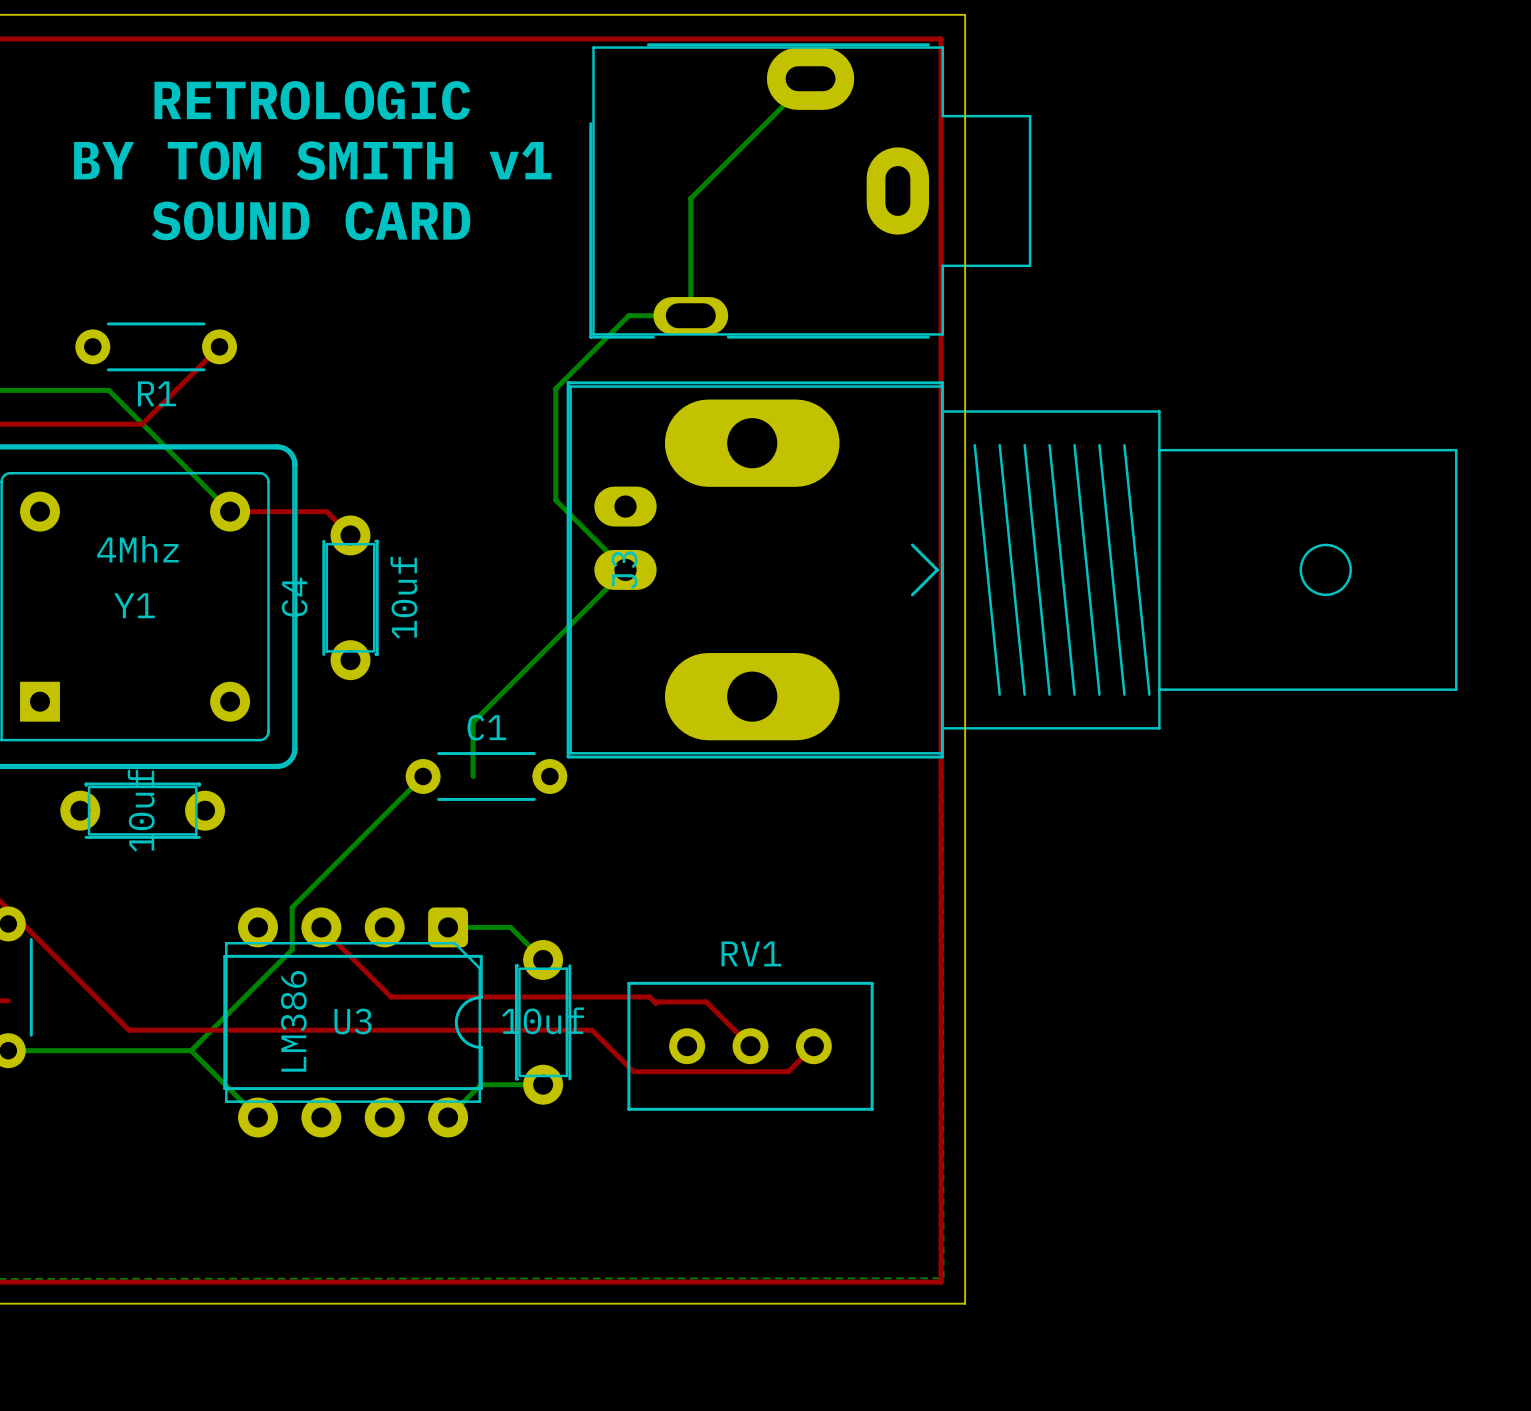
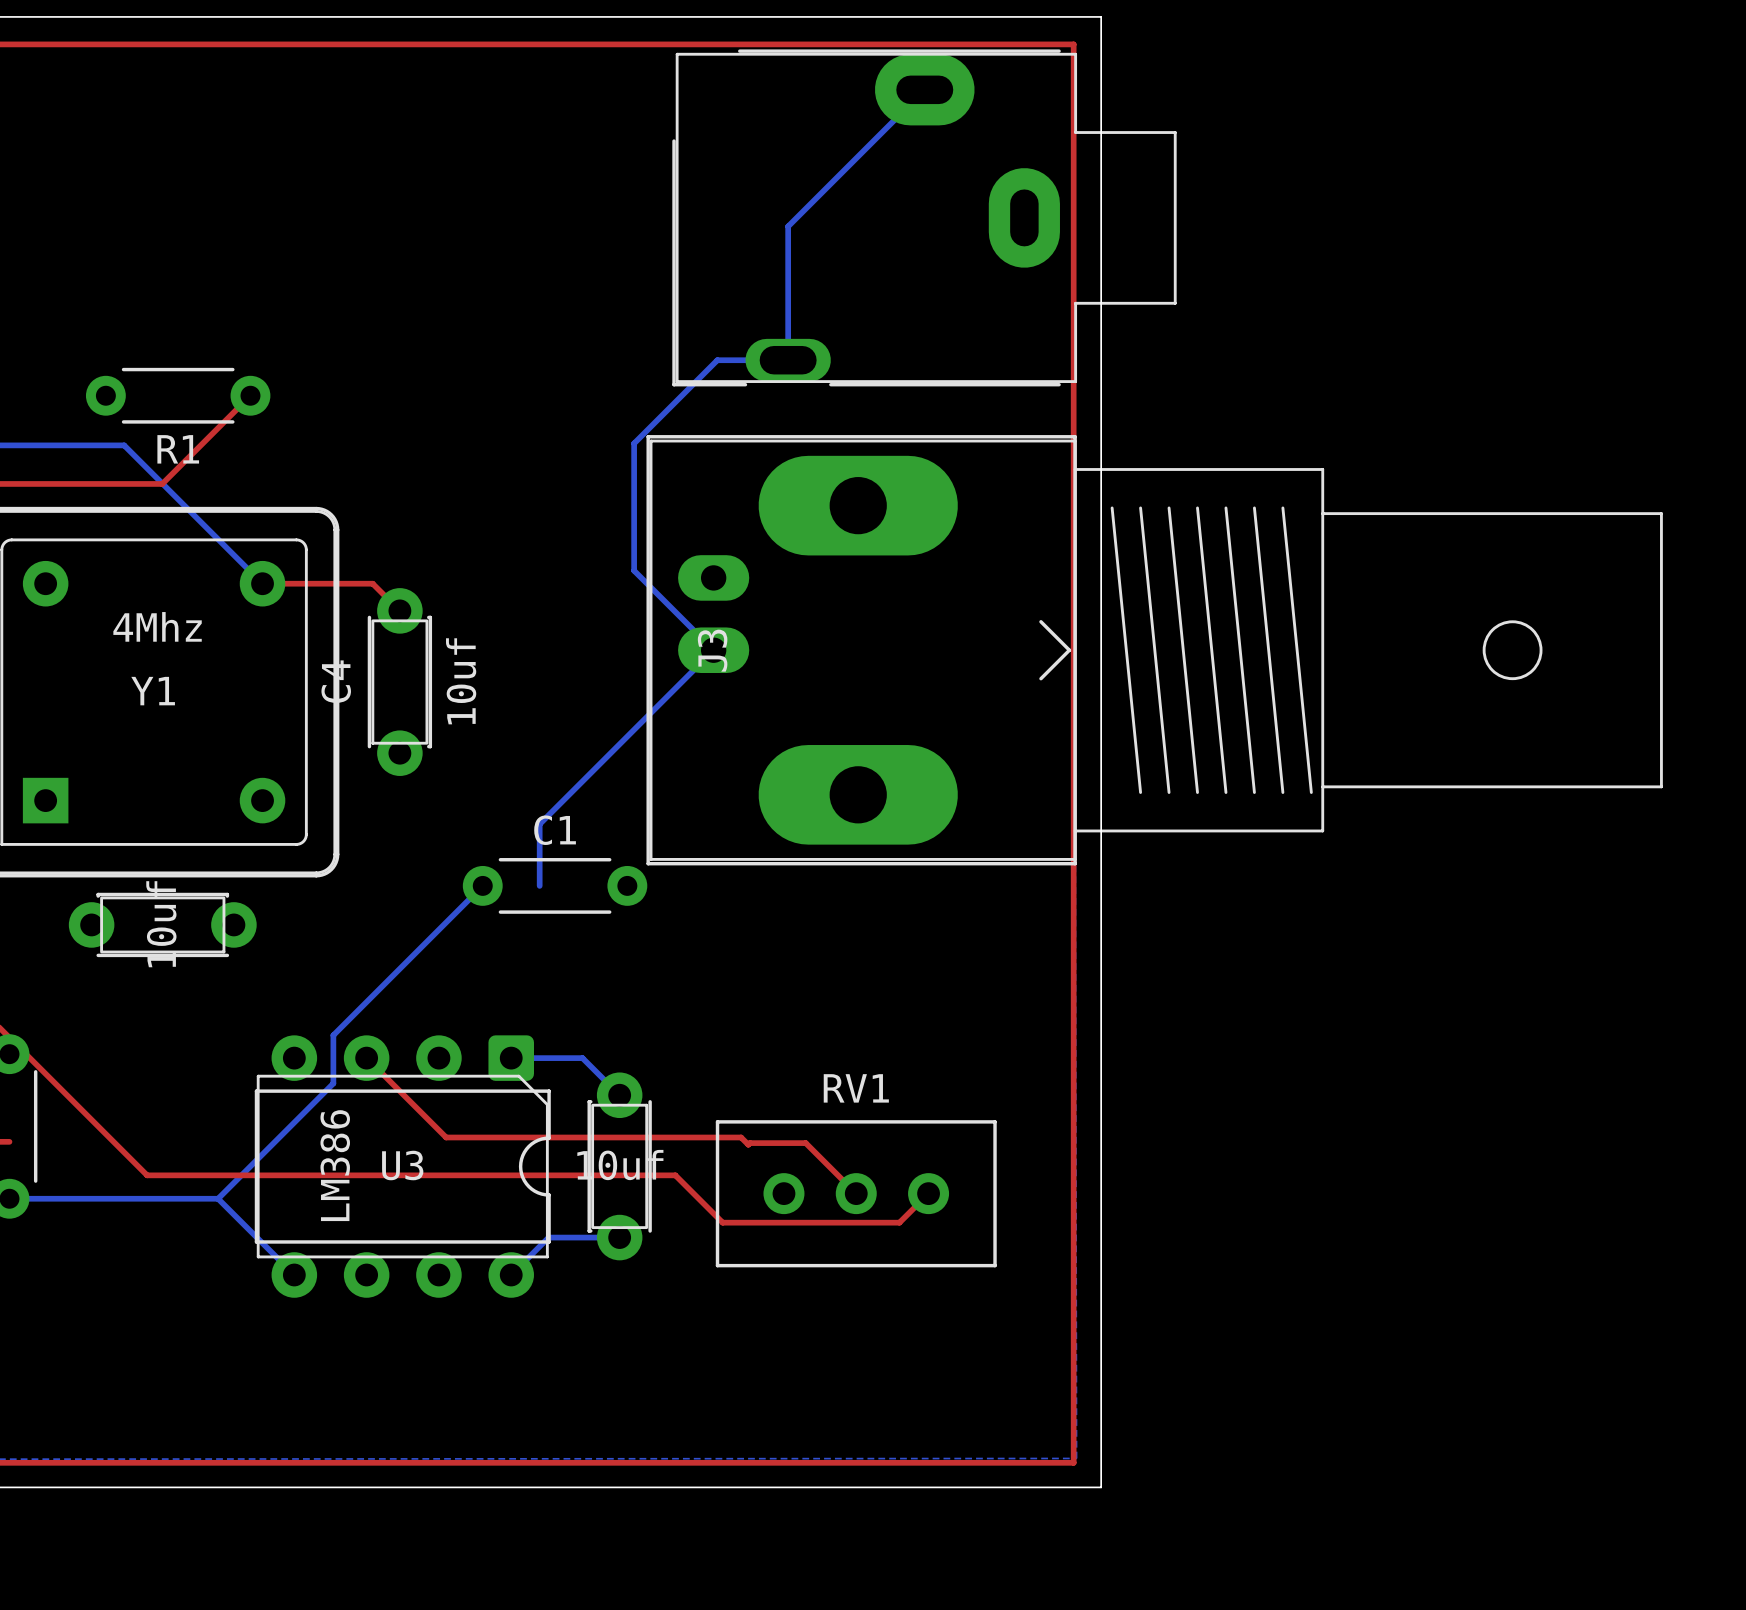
text: RETROLOGIC (312, 100) -> none
text: BY TOM SMITH v1 (312, 160) -> none
text: SOUND CARD (311, 220) -> none

